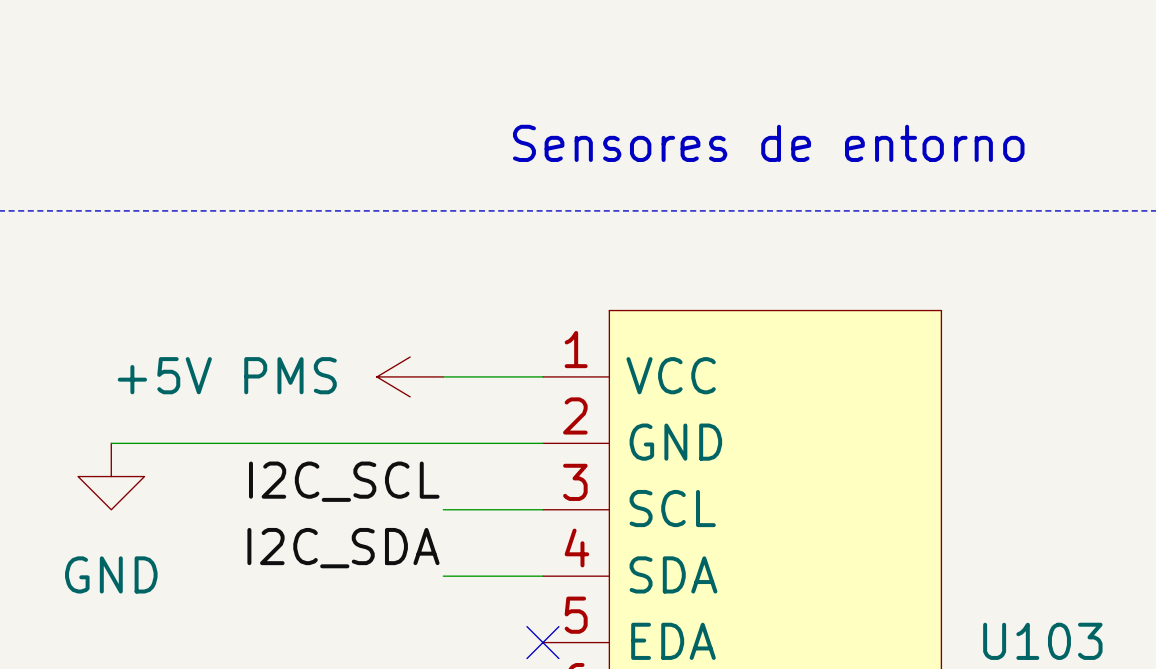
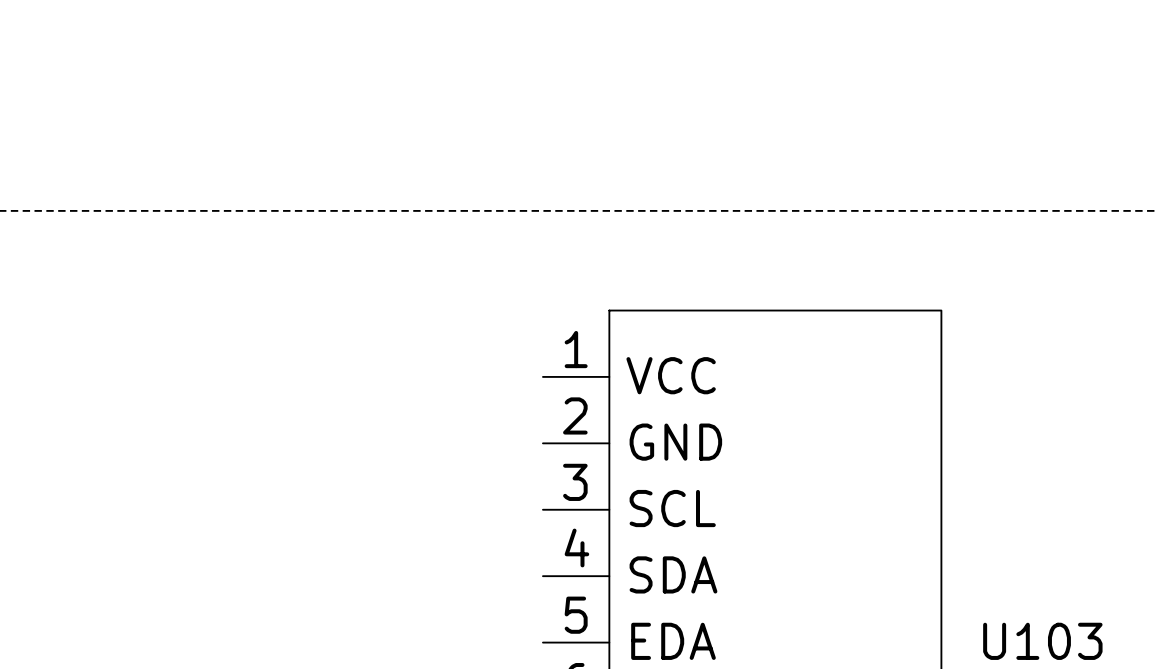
text: Sensores de entorno (768, 143) -> none
power symbol: +5V PMS (410, 376) -> none
wire: (443, 376) (542, 376) -> none
wire: (111, 443) (542, 443) -> none
power symbol: GND (111, 476) -> none
label: I2C_SCL (344, 481) -> none
wire: (443, 509) (542, 509) -> none
label: I2C_SDA (343, 548) -> none
wire: (443, 576) (542, 576) -> none
no-connect mark: (542, 642) -> none

